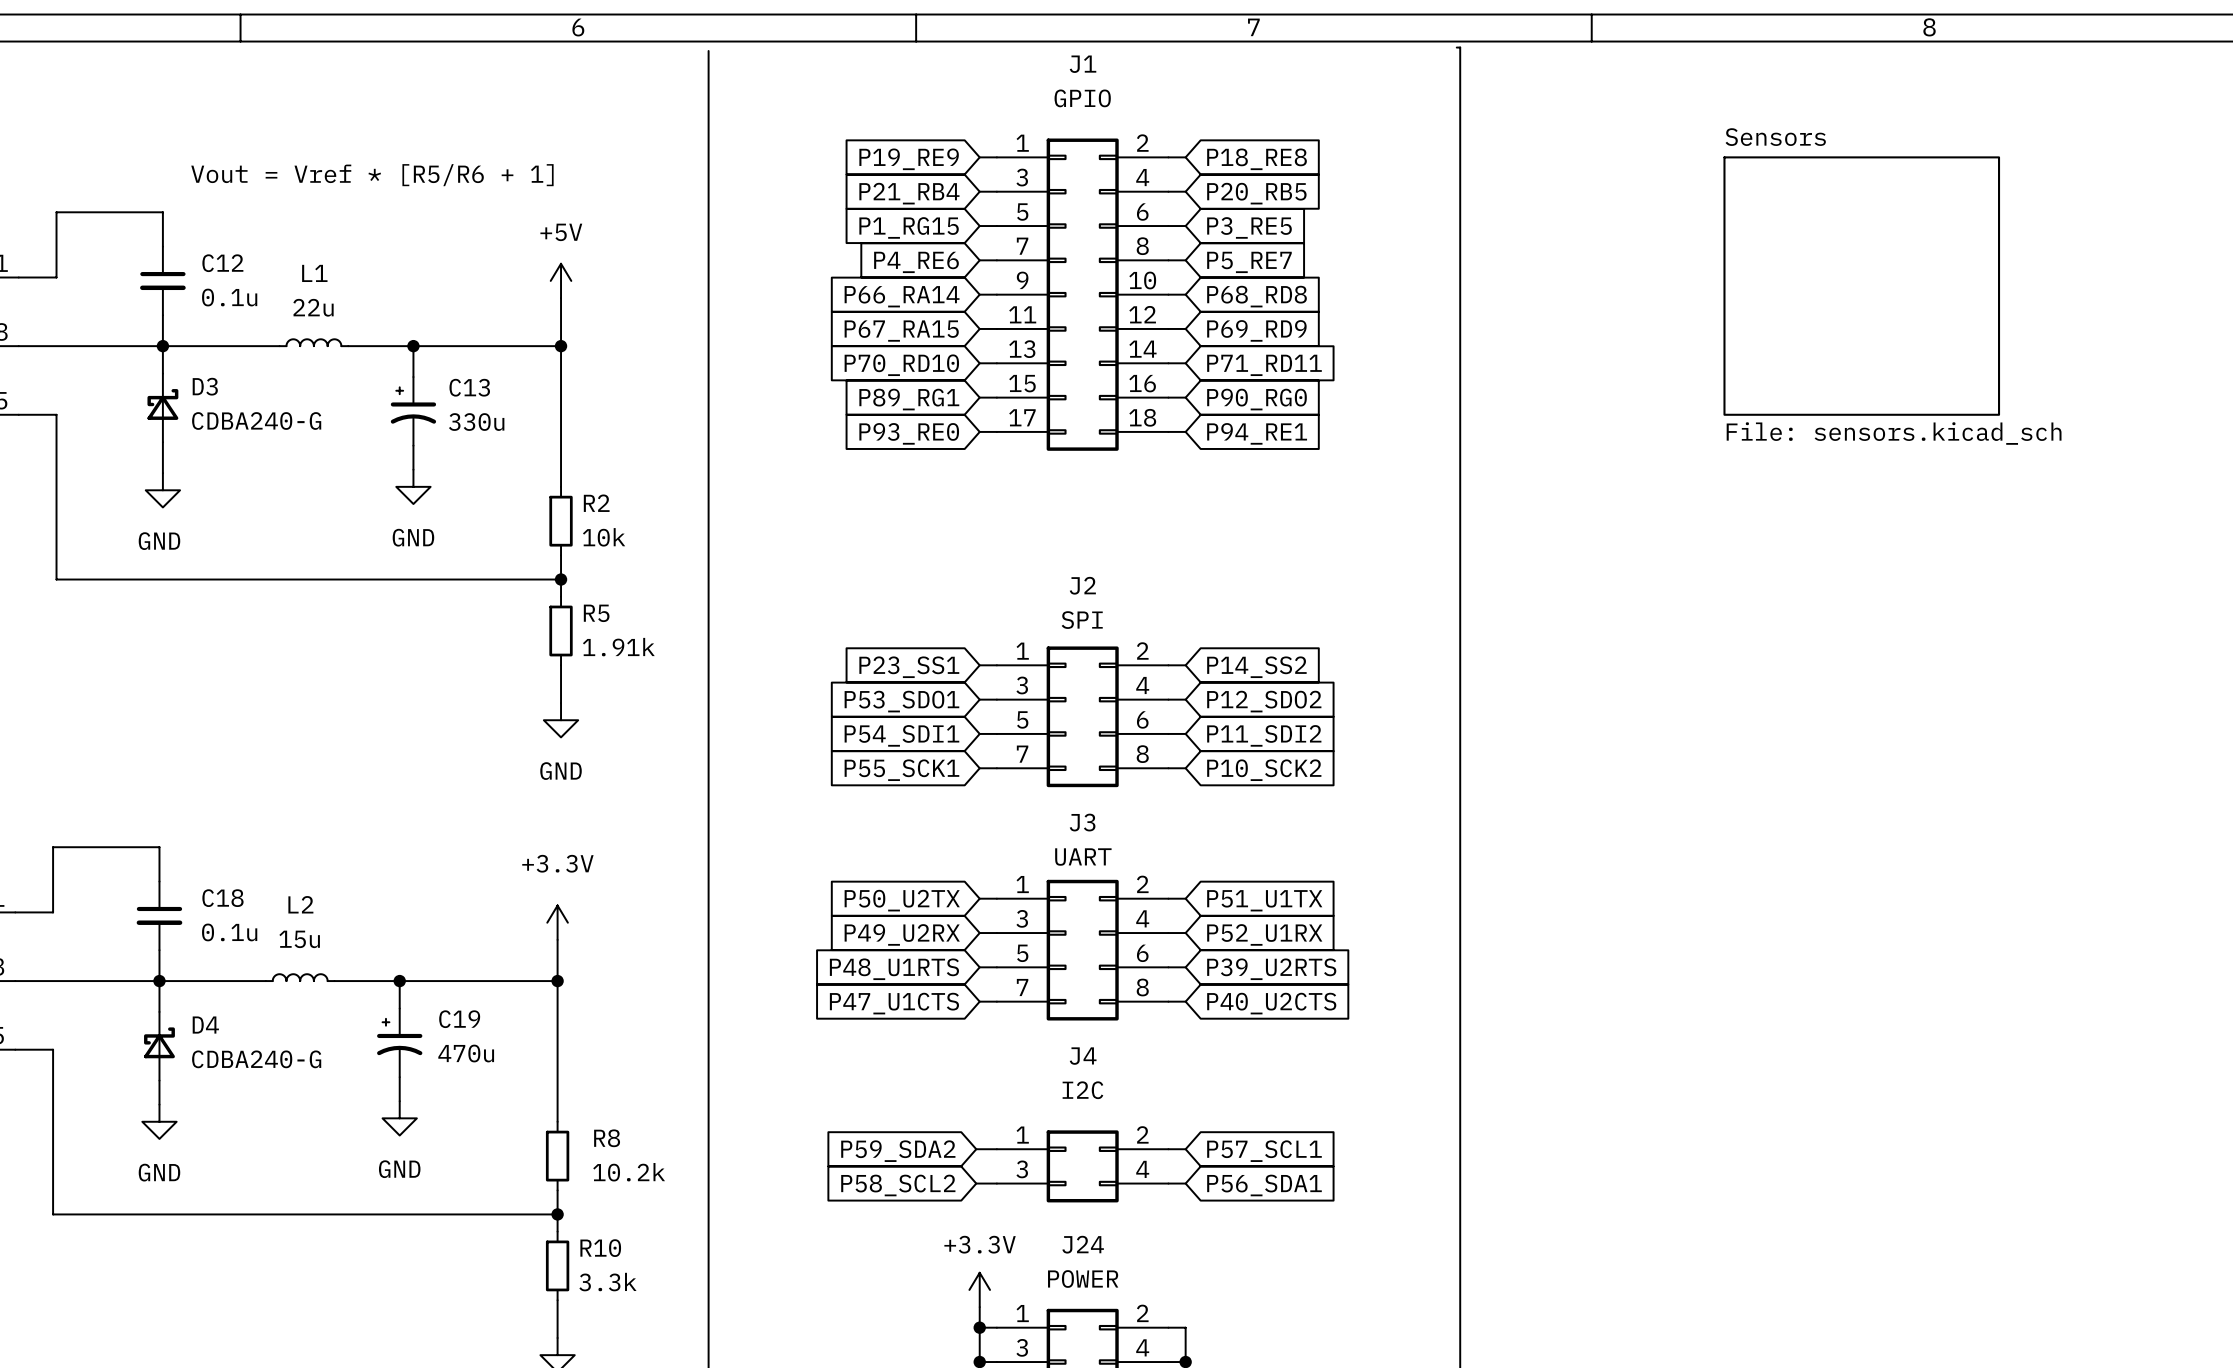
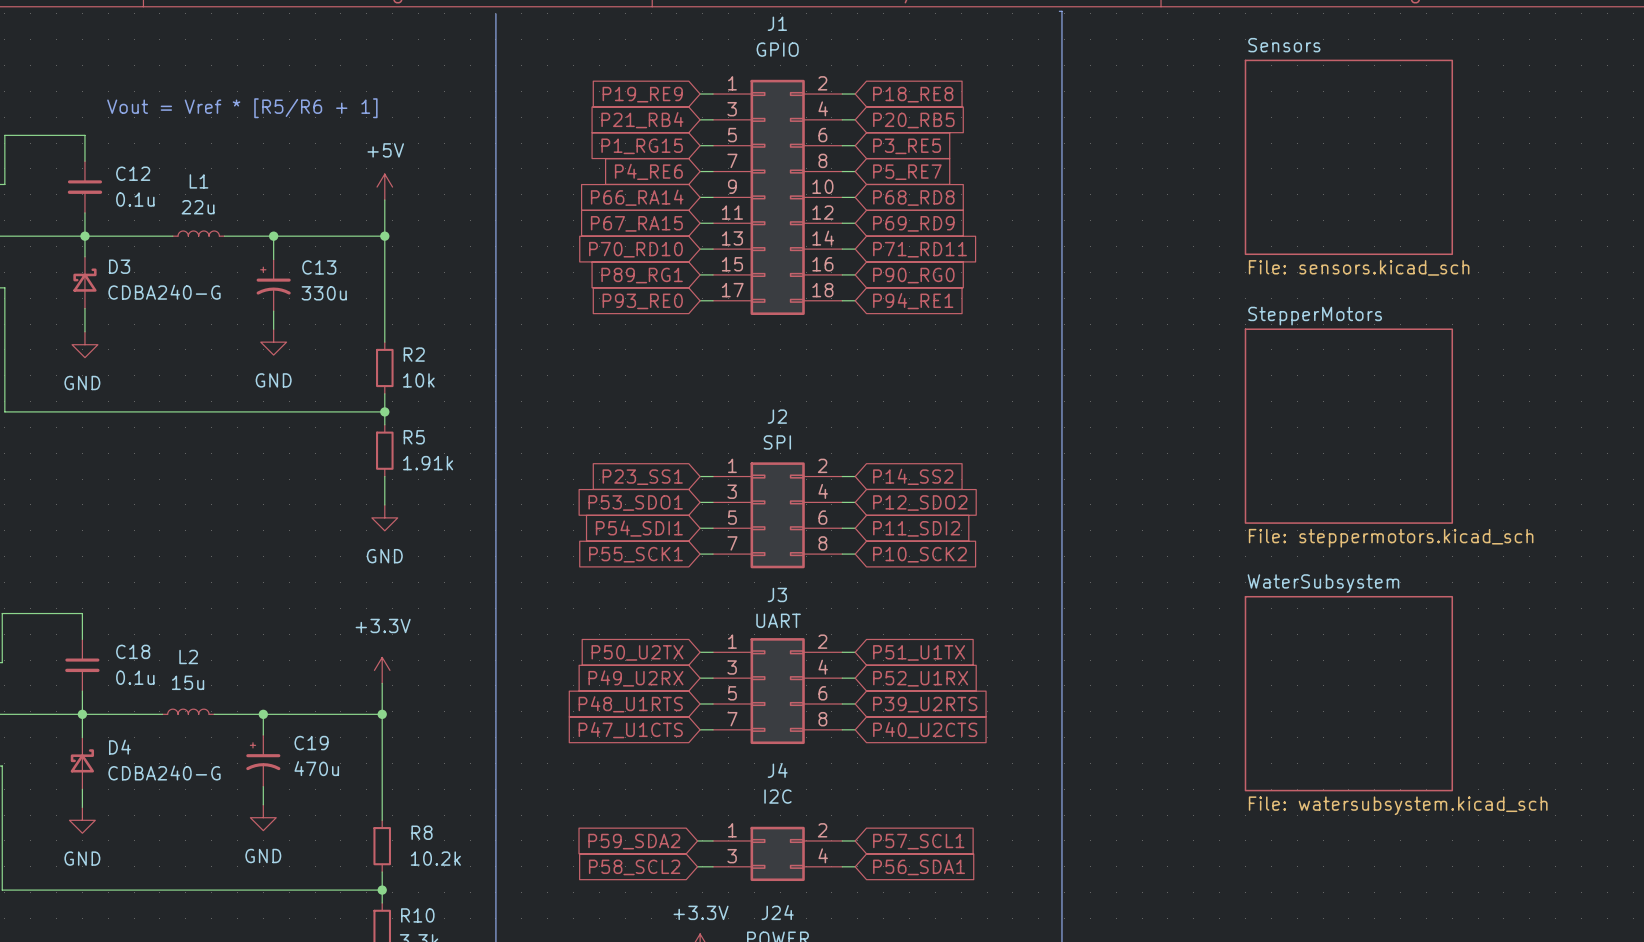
sheet Sensors position: (1861, 286) -> (1348, 157)
sheet StepperMotors: none -> File: steppermotors.kicad_sch (1348, 426)
sheet WaterSubsystem: none -> File: watersubsystem.kicad_sch (1348, 693)

